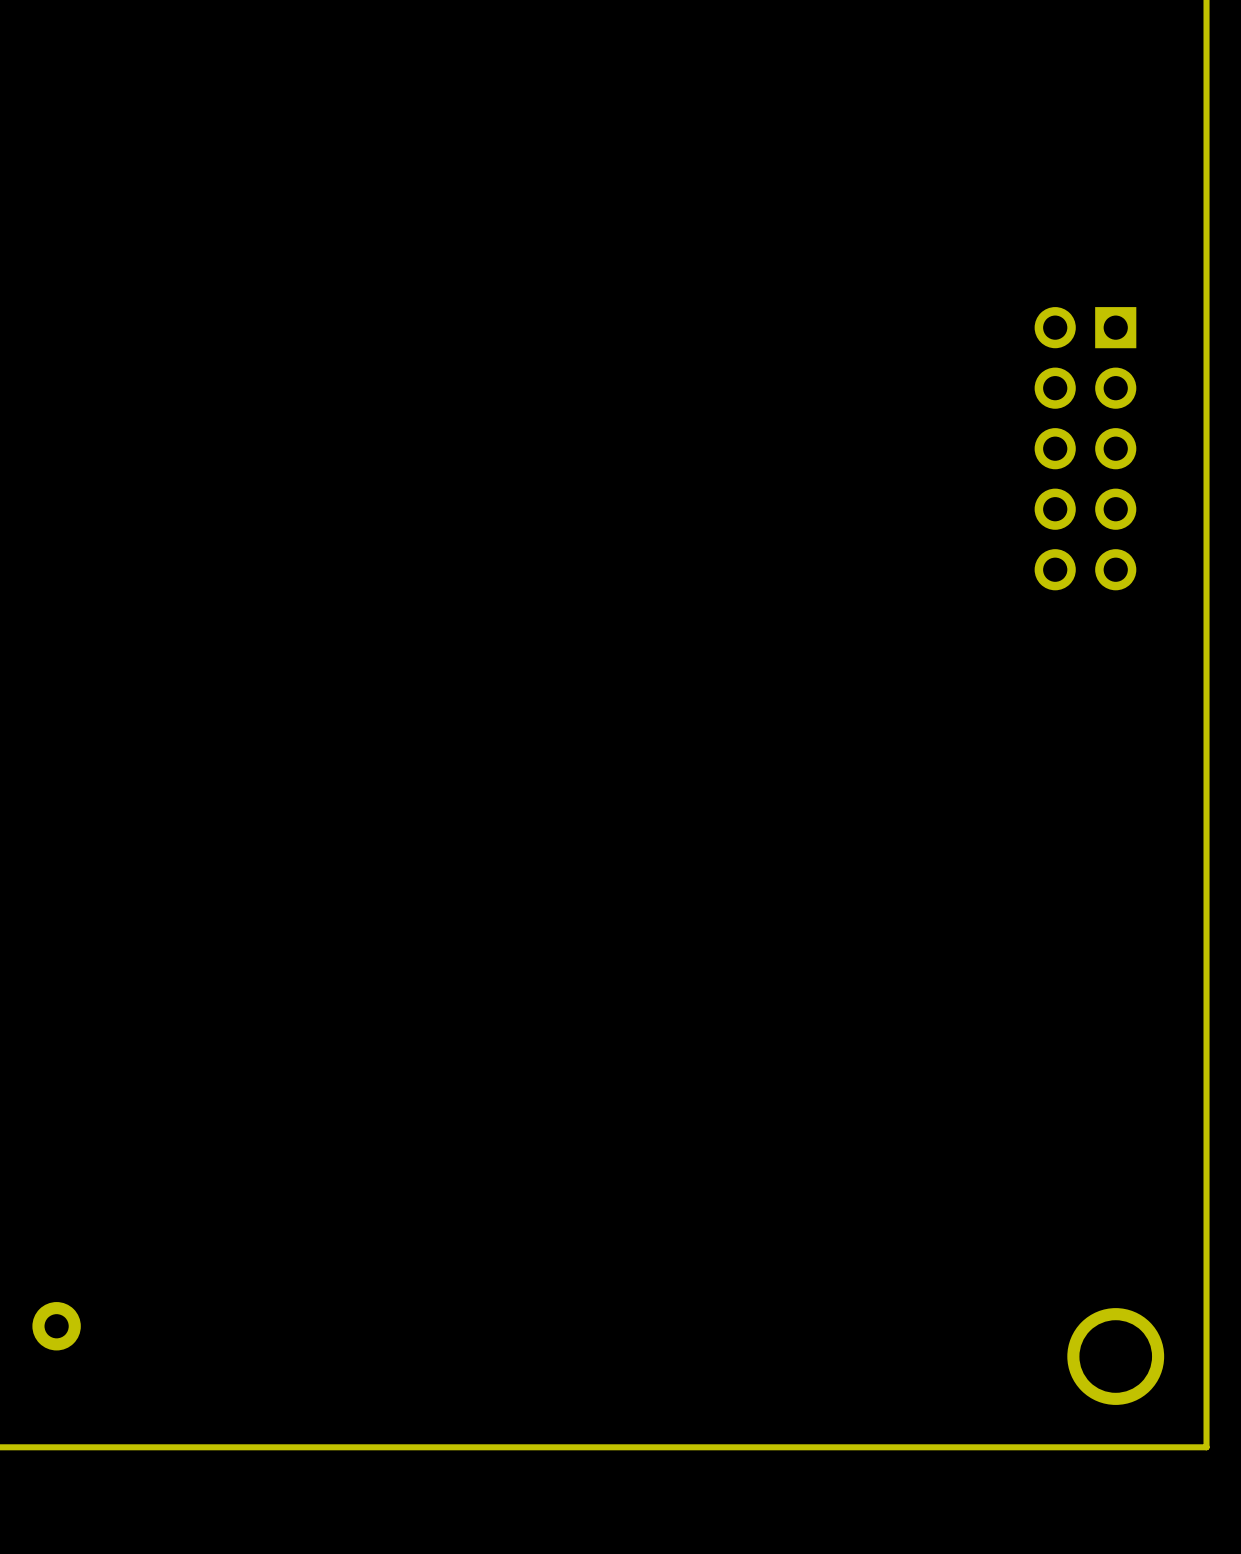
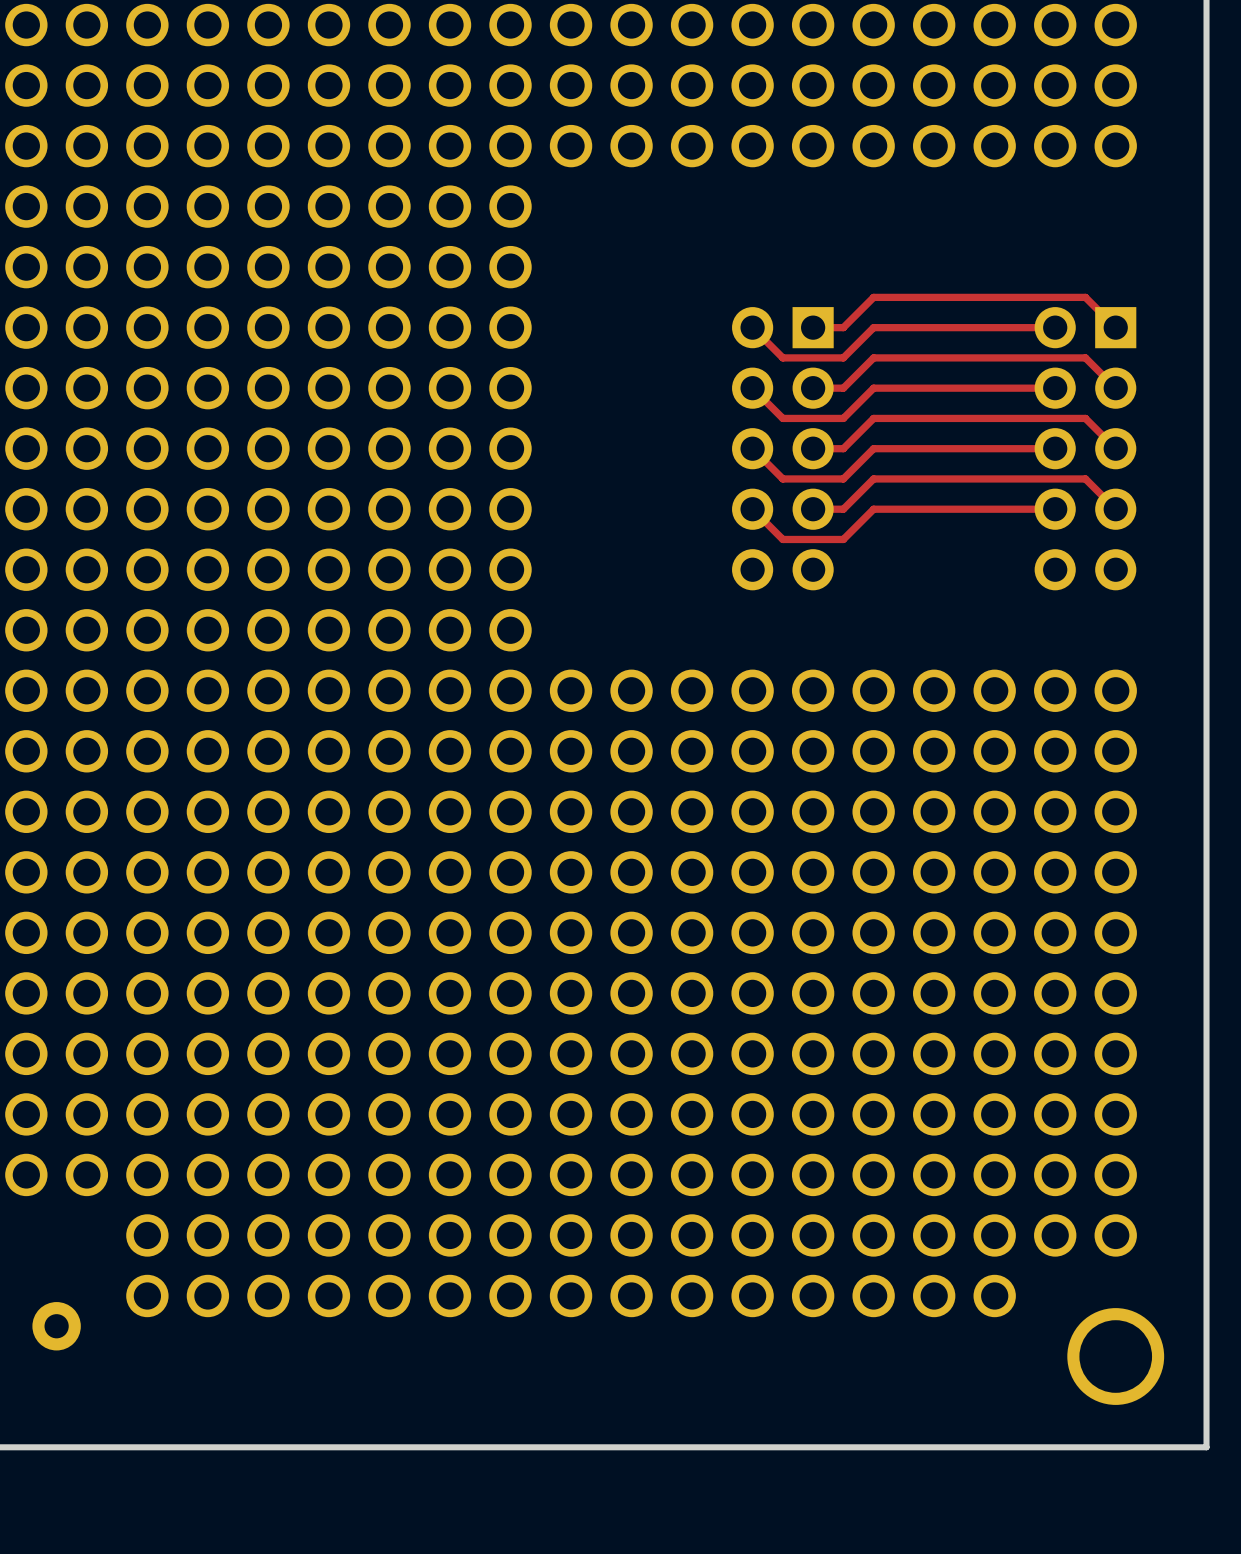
part: none -> (26, 25)
part: none -> (86, 25)
part: none -> (147, 25)
part: none -> (207, 25)
part: none -> (268, 25)
part: none -> (328, 25)
part: none -> (389, 25)
part: none -> (450, 25)
part: none -> (510, 25)
part: none -> (571, 25)
part: none -> (631, 25)
part: none -> (692, 25)
part: none -> (752, 25)
part: none -> (813, 25)
part: none -> (873, 25)
part: none -> (934, 25)
part: none -> (994, 25)
part: none -> (1055, 25)
part: none -> (1115, 25)
part: none -> (26, 85)
part: none -> (86, 85)
part: none -> (147, 85)
part: none -> (207, 85)
part: none -> (268, 85)
part: none -> (328, 85)
part: none -> (389, 85)
part: none -> (450, 85)
part: none -> (510, 85)
part: none -> (571, 85)
part: none -> (631, 85)
part: none -> (692, 85)
part: none -> (752, 85)
part: none -> (813, 85)
part: none -> (873, 85)
part: none -> (934, 85)
part: none -> (994, 85)
part: none -> (1055, 85)
part: none -> (1115, 85)
part: none -> (26, 146)
part: none -> (86, 146)
part: none -> (147, 146)
part: none -> (207, 146)
part: none -> (268, 146)
part: none -> (328, 146)
part: none -> (389, 146)
part: none -> (450, 146)
part: none -> (510, 146)
part: none -> (571, 146)
part: none -> (631, 146)
part: none -> (692, 146)
part: none -> (752, 146)
part: none -> (813, 146)
part: none -> (873, 146)
part: none -> (934, 146)
part: none -> (994, 146)
part: none -> (1055, 146)
part: none -> (1115, 146)
part: none -> (26, 206)
part: none -> (86, 206)
part: none -> (147, 206)
part: none -> (207, 206)
part: none -> (268, 206)
part: none -> (328, 206)
part: none -> (389, 206)
part: none -> (450, 206)
part: none -> (510, 206)
part: none -> (26, 267)
part: none -> (86, 267)
part: none -> (147, 267)
part: none -> (207, 267)
part: none -> (268, 267)
part: none -> (328, 267)
part: none -> (389, 267)
part: none -> (450, 267)
part: none -> (510, 267)
part: none -> (26, 327)
part: none -> (86, 327)
part: none -> (147, 327)
part: none -> (207, 327)
part: none -> (268, 327)
part: none -> (328, 327)
part: none -> (389, 327)
part: none -> (450, 327)
part: none -> (510, 327)
top track: none -> (1055, 327) (873, 327) (843, 357) (782, 357) (752, 327)
top track: none -> (1115, 327) (1085, 297) (873, 297) (843, 327) (813, 327)
part: none -> (26, 388)
part: none -> (86, 388)
part: none -> (147, 388)
part: none -> (207, 388)
part: none -> (268, 388)
part: none -> (328, 388)
part: none -> (389, 388)
part: none -> (450, 388)
part: none -> (510, 388)
top track: none -> (1055, 388) (873, 388) (843, 418) (782, 418) (752, 388)
top track: none -> (1115, 388) (1085, 357) (873, 357) (843, 388) (813, 388)
part: none -> (26, 448)
part: none -> (86, 448)
part: none -> (147, 448)
part: none -> (207, 448)
part: none -> (268, 448)
part: none -> (328, 448)
part: none -> (389, 448)
part: none -> (450, 448)
part: none -> (510, 448)
part: none -> (782, 448)
top track: none -> (1055, 448) (873, 448) (843, 478) (782, 478) (752, 448)
top track: none -> (1115, 448) (1085, 418) (873, 418) (843, 448) (813, 448)
part: none -> (26, 509)
part: none -> (86, 509)
part: none -> (147, 509)
part: none -> (207, 509)
part: none -> (268, 509)
part: none -> (328, 509)
part: none -> (389, 509)
part: none -> (450, 509)
part: none -> (510, 509)
top track: none -> (1055, 509) (873, 509) (843, 539) (782, 539) (752, 509)
top track: none -> (1115, 509) (1085, 478) (873, 478) (843, 509) (813, 509)
part: none -> (26, 569)
part: none -> (86, 569)
part: none -> (147, 569)
part: none -> (207, 569)
part: none -> (268, 569)
part: none -> (328, 569)
part: none -> (389, 569)
part: none -> (450, 569)
part: none -> (510, 569)
part: none -> (26, 630)
part: none -> (86, 630)
part: none -> (147, 630)
part: none -> (207, 630)
part: none -> (268, 630)
part: none -> (328, 630)
part: none -> (389, 630)
part: none -> (450, 630)
part: none -> (510, 630)
part: none -> (26, 690)
part: none -> (86, 690)
part: none -> (147, 690)
part: none -> (207, 690)
part: none -> (268, 690)
part: none -> (328, 690)
part: none -> (389, 690)
part: none -> (450, 690)
part: none -> (510, 690)
part: none -> (571, 690)
part: none -> (631, 690)
part: none -> (692, 690)
part: none -> (752, 690)
part: none -> (813, 690)
part: none -> (873, 690)
part: none -> (934, 690)
part: none -> (994, 690)
part: none -> (1055, 690)
part: none -> (1115, 690)
part: none -> (26, 751)
part: none -> (86, 751)
part: none -> (147, 751)
part: none -> (207, 751)
part: none -> (268, 751)
part: none -> (328, 751)
part: none -> (389, 751)
part: none -> (450, 751)
part: none -> (510, 751)
part: none -> (571, 751)
part: none -> (631, 751)
part: none -> (692, 751)
part: none -> (752, 751)
part: none -> (813, 751)
part: none -> (873, 751)
part: none -> (934, 751)
part: none -> (994, 751)
part: none -> (1055, 751)
part: none -> (1115, 751)
part: none -> (26, 811)
part: none -> (86, 811)
part: none -> (147, 811)
part: none -> (207, 811)
part: none -> (268, 811)
part: none -> (328, 811)
part: none -> (389, 811)
part: none -> (450, 811)
part: none -> (510, 811)
part: none -> (571, 811)
part: none -> (631, 811)
part: none -> (692, 811)
part: none -> (752, 811)
part: none -> (813, 811)
part: none -> (873, 811)
part: none -> (934, 811)
part: none -> (994, 811)
part: none -> (1055, 811)
part: none -> (1115, 811)
part: none -> (26, 872)
part: none -> (86, 872)
part: none -> (147, 872)
part: none -> (207, 872)
part: none -> (268, 872)
part: none -> (328, 872)
part: none -> (389, 872)
part: none -> (450, 872)
part: none -> (510, 872)
part: none -> (571, 872)
part: none -> (631, 872)
part: none -> (692, 872)
part: none -> (752, 872)
part: none -> (813, 872)
part: none -> (873, 872)
part: none -> (934, 872)
part: none -> (994, 872)
part: none -> (1055, 872)
part: none -> (1115, 872)
part: none -> (26, 932)
part: none -> (86, 932)
part: none -> (147, 932)
part: none -> (207, 932)
part: none -> (268, 932)
part: none -> (328, 932)
part: none -> (389, 932)
part: none -> (450, 932)
part: none -> (510, 932)
part: none -> (571, 932)
part: none -> (631, 932)
part: none -> (692, 932)
part: none -> (752, 932)
part: none -> (813, 932)
part: none -> (873, 932)
part: none -> (934, 932)
part: none -> (994, 932)
part: none -> (1055, 932)
part: none -> (1115, 932)
part: none -> (26, 993)
part: none -> (86, 993)
part: none -> (147, 993)
part: none -> (207, 993)
part: none -> (268, 993)
part: none -> (328, 993)
part: none -> (389, 993)
part: none -> (450, 993)
part: none -> (510, 993)
part: none -> (571, 993)
part: none -> (631, 993)
part: none -> (692, 993)
part: none -> (752, 993)
part: none -> (813, 993)
part: none -> (873, 993)
part: none -> (934, 993)
part: none -> (994, 993)
part: none -> (1055, 993)
part: none -> (1115, 993)
part: none -> (26, 1053)
part: none -> (86, 1053)
part: none -> (147, 1053)
part: none -> (207, 1053)
part: none -> (268, 1053)
part: none -> (328, 1053)
part: none -> (389, 1053)
part: none -> (450, 1053)
part: none -> (510, 1053)
part: none -> (571, 1053)
part: none -> (631, 1053)
part: none -> (692, 1053)
part: none -> (752, 1053)
part: none -> (813, 1053)
part: none -> (873, 1053)
part: none -> (934, 1053)
part: none -> (994, 1053)
part: none -> (1055, 1053)
part: none -> (1115, 1053)
part: none -> (26, 1114)
part: none -> (86, 1114)
part: none -> (147, 1114)
part: none -> (207, 1114)
part: none -> (268, 1114)
part: none -> (328, 1114)
part: none -> (389, 1114)
part: none -> (450, 1114)
part: none -> (510, 1114)
part: none -> (571, 1114)
part: none -> (631, 1114)
part: none -> (692, 1114)
part: none -> (752, 1114)
part: none -> (813, 1114)
part: none -> (873, 1114)
part: none -> (934, 1114)
part: none -> (994, 1114)
part: none -> (1055, 1114)
part: none -> (1115, 1114)
part: none -> (26, 1174)
part: none -> (86, 1174)
part: none -> (147, 1174)
part: none -> (207, 1174)
part: none -> (268, 1174)
part: none -> (328, 1174)
part: none -> (389, 1174)
part: none -> (450, 1174)
part: none -> (510, 1174)
part: none -> (571, 1174)
part: none -> (631, 1174)
part: none -> (692, 1174)
part: none -> (752, 1174)
part: none -> (813, 1174)
part: none -> (873, 1174)
part: none -> (934, 1174)
part: none -> (994, 1174)
part: none -> (1055, 1174)
part: none -> (1115, 1174)
part: none -> (147, 1235)
part: none -> (207, 1235)
part: none -> (268, 1235)
part: none -> (328, 1235)
part: none -> (389, 1235)
part: none -> (450, 1235)
part: none -> (510, 1235)
part: none -> (571, 1235)
part: none -> (631, 1235)
part: none -> (692, 1235)
part: none -> (752, 1235)
part: none -> (813, 1235)
part: none -> (873, 1235)
part: none -> (934, 1235)
part: none -> (994, 1235)
part: none -> (1055, 1235)
part: none -> (1115, 1235)
part: none -> (147, 1295)
part: none -> (207, 1295)
part: none -> (268, 1295)
part: none -> (328, 1295)
part: none -> (389, 1295)
part: none -> (450, 1295)
part: none -> (510, 1295)
part: none -> (571, 1295)
part: none -> (631, 1295)
part: none -> (692, 1295)
part: none -> (752, 1295)
part: none -> (813, 1295)
part: none -> (873, 1295)
part: none -> (934, 1295)
part: none -> (994, 1295)

